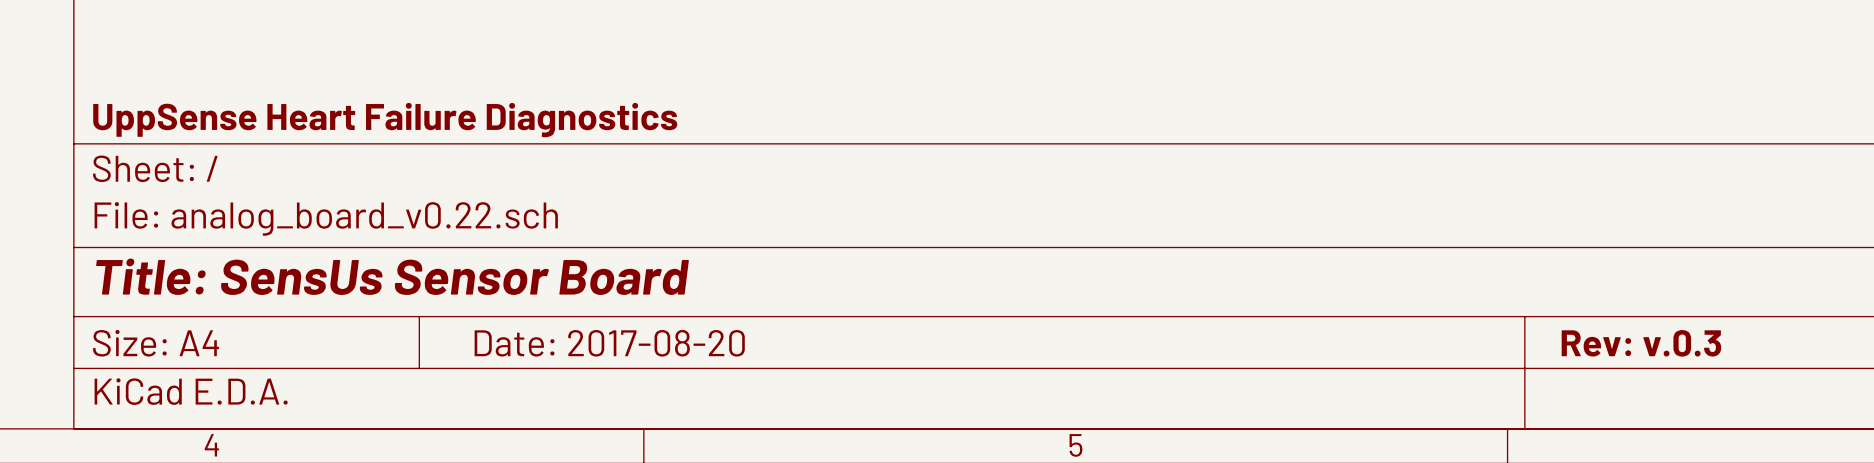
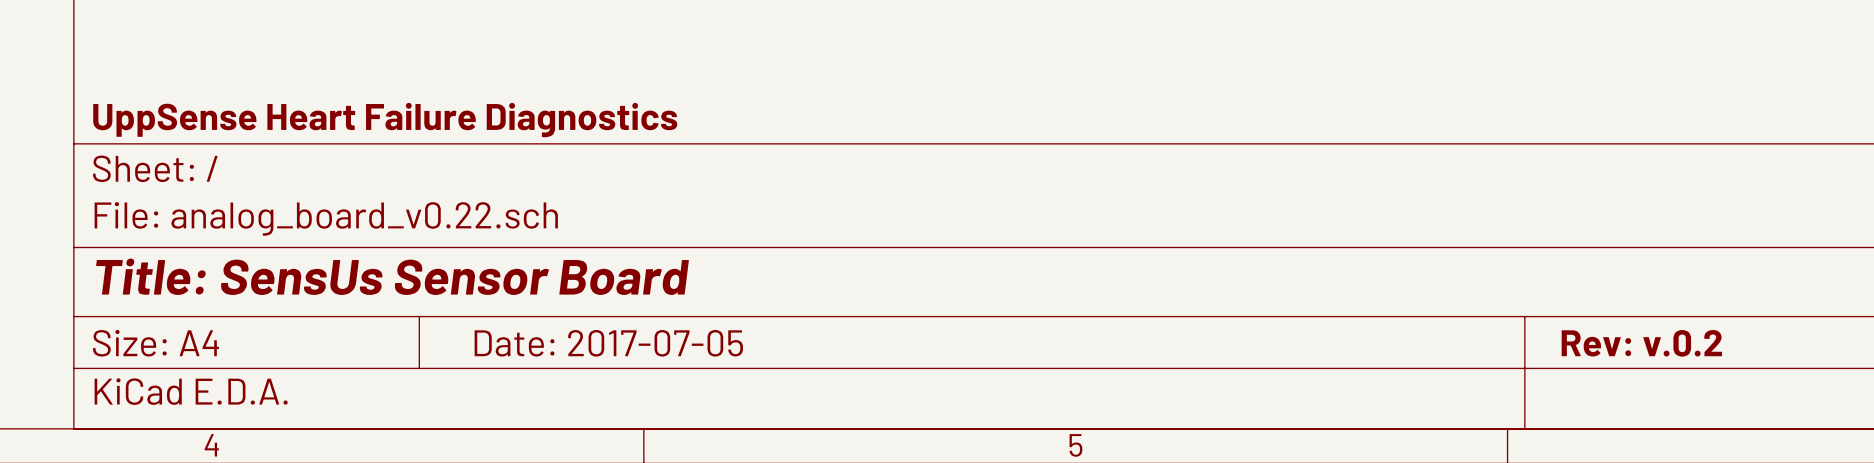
title block: Date: 2017-08-20 (609, 343) -> Date: 2017-07-05 (608, 343)
title block: Rev: v.0.3 (1641, 343) -> Rev: v.0.2 (1641, 343)

